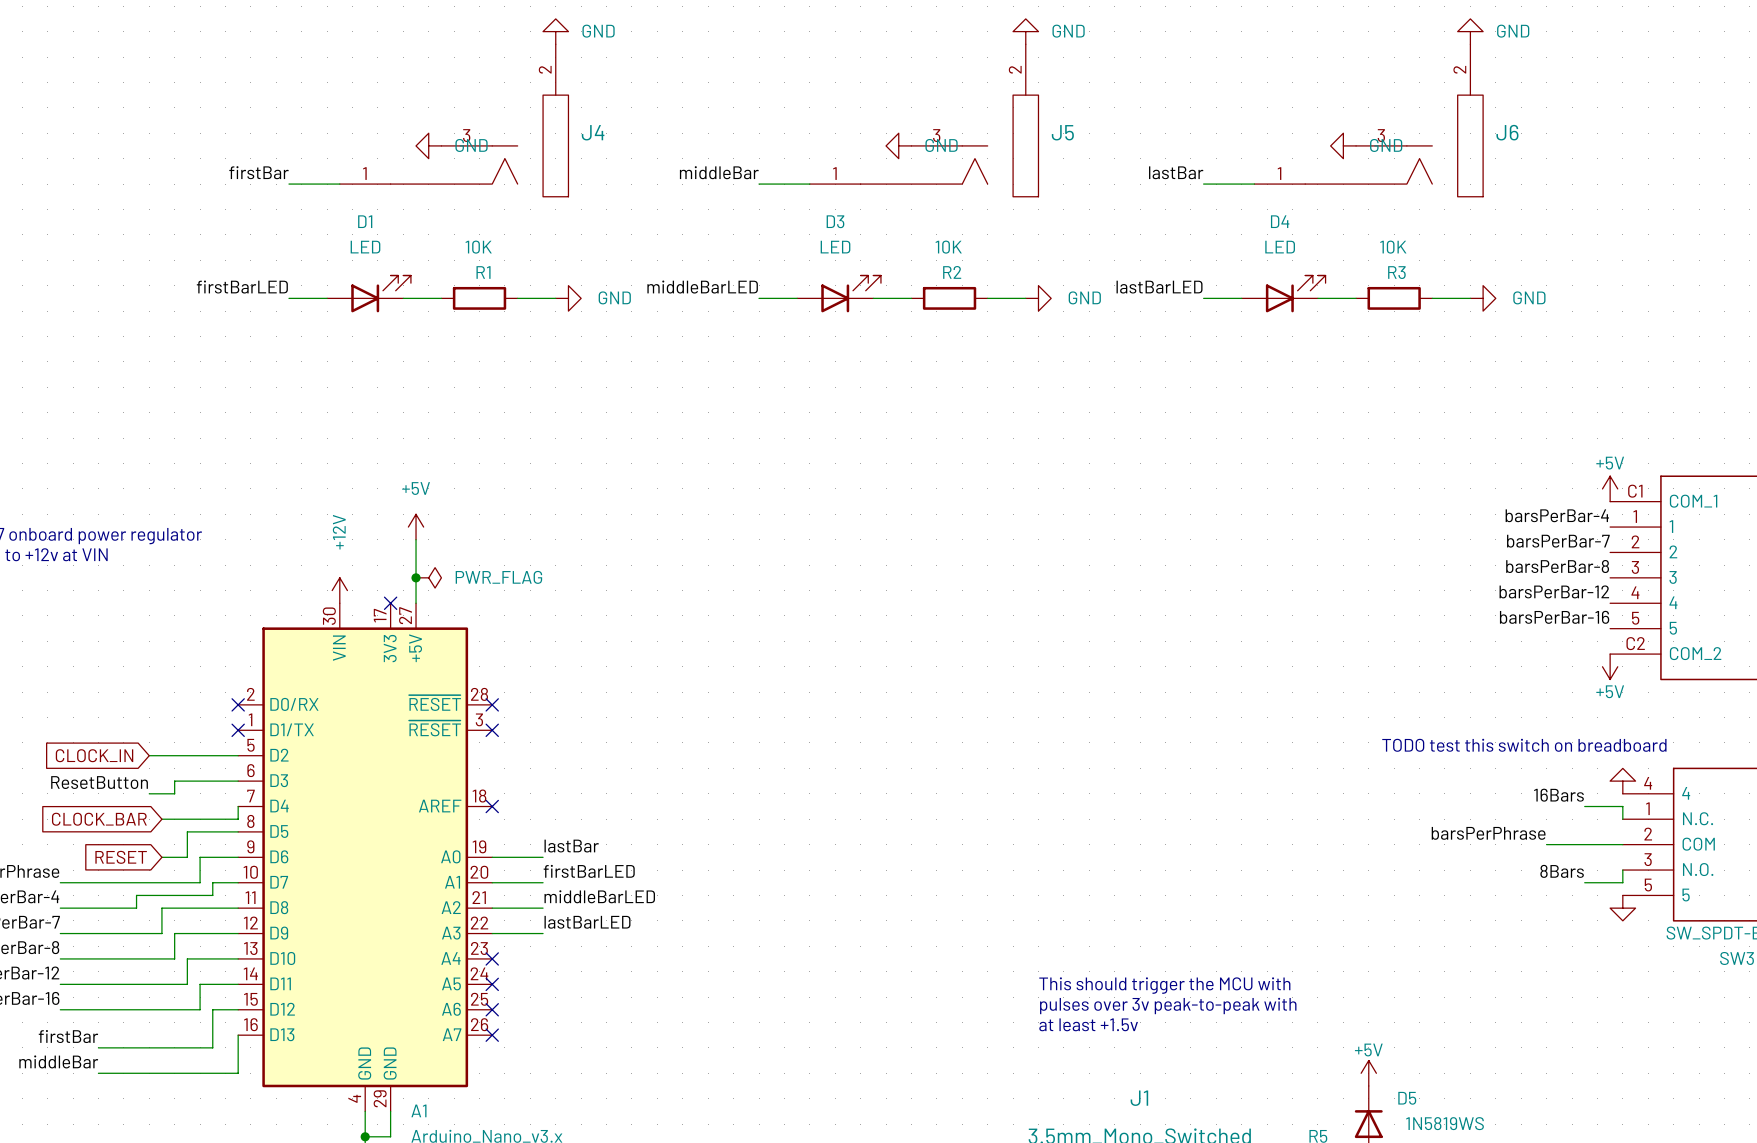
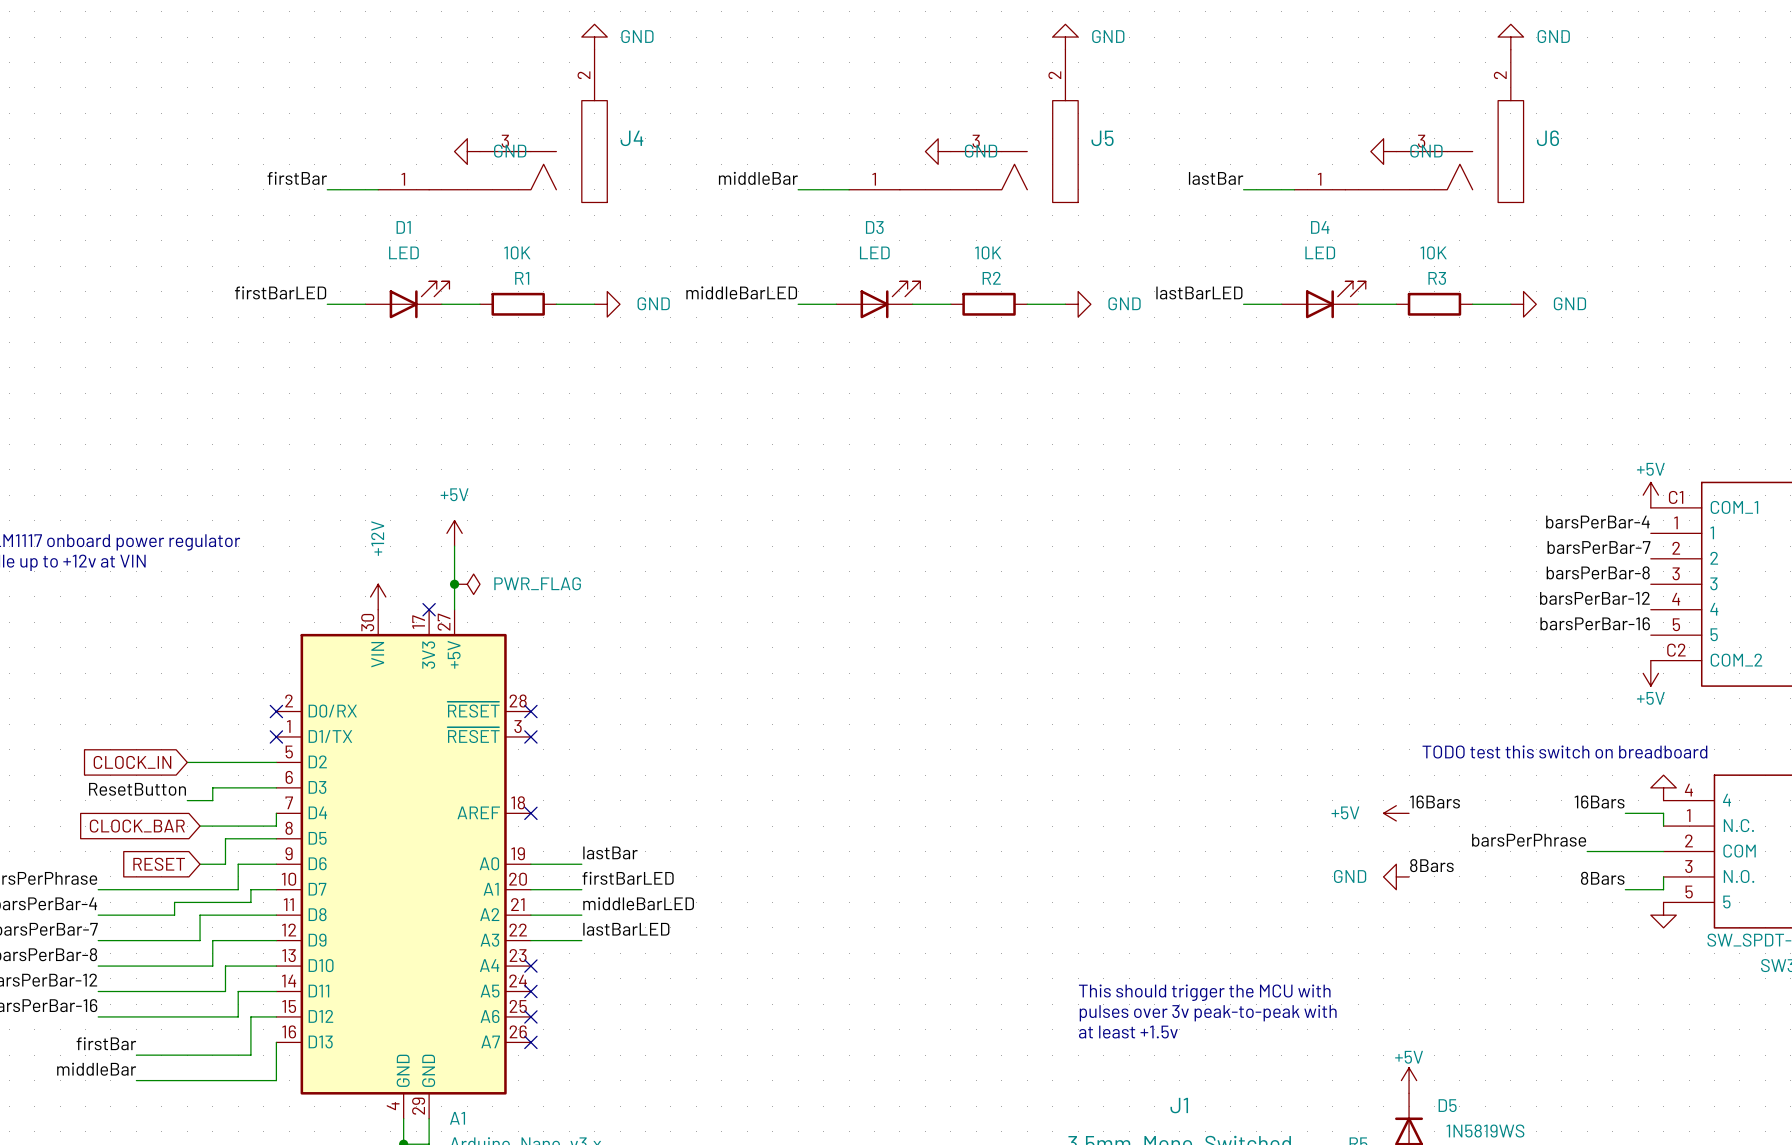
label: none -> 16Bars (1435, 801)
power symbol: none -> +5V (1396, 813)
label: none -> 8Bars (1431, 865)
power symbol: none -> GND (1396, 876)

